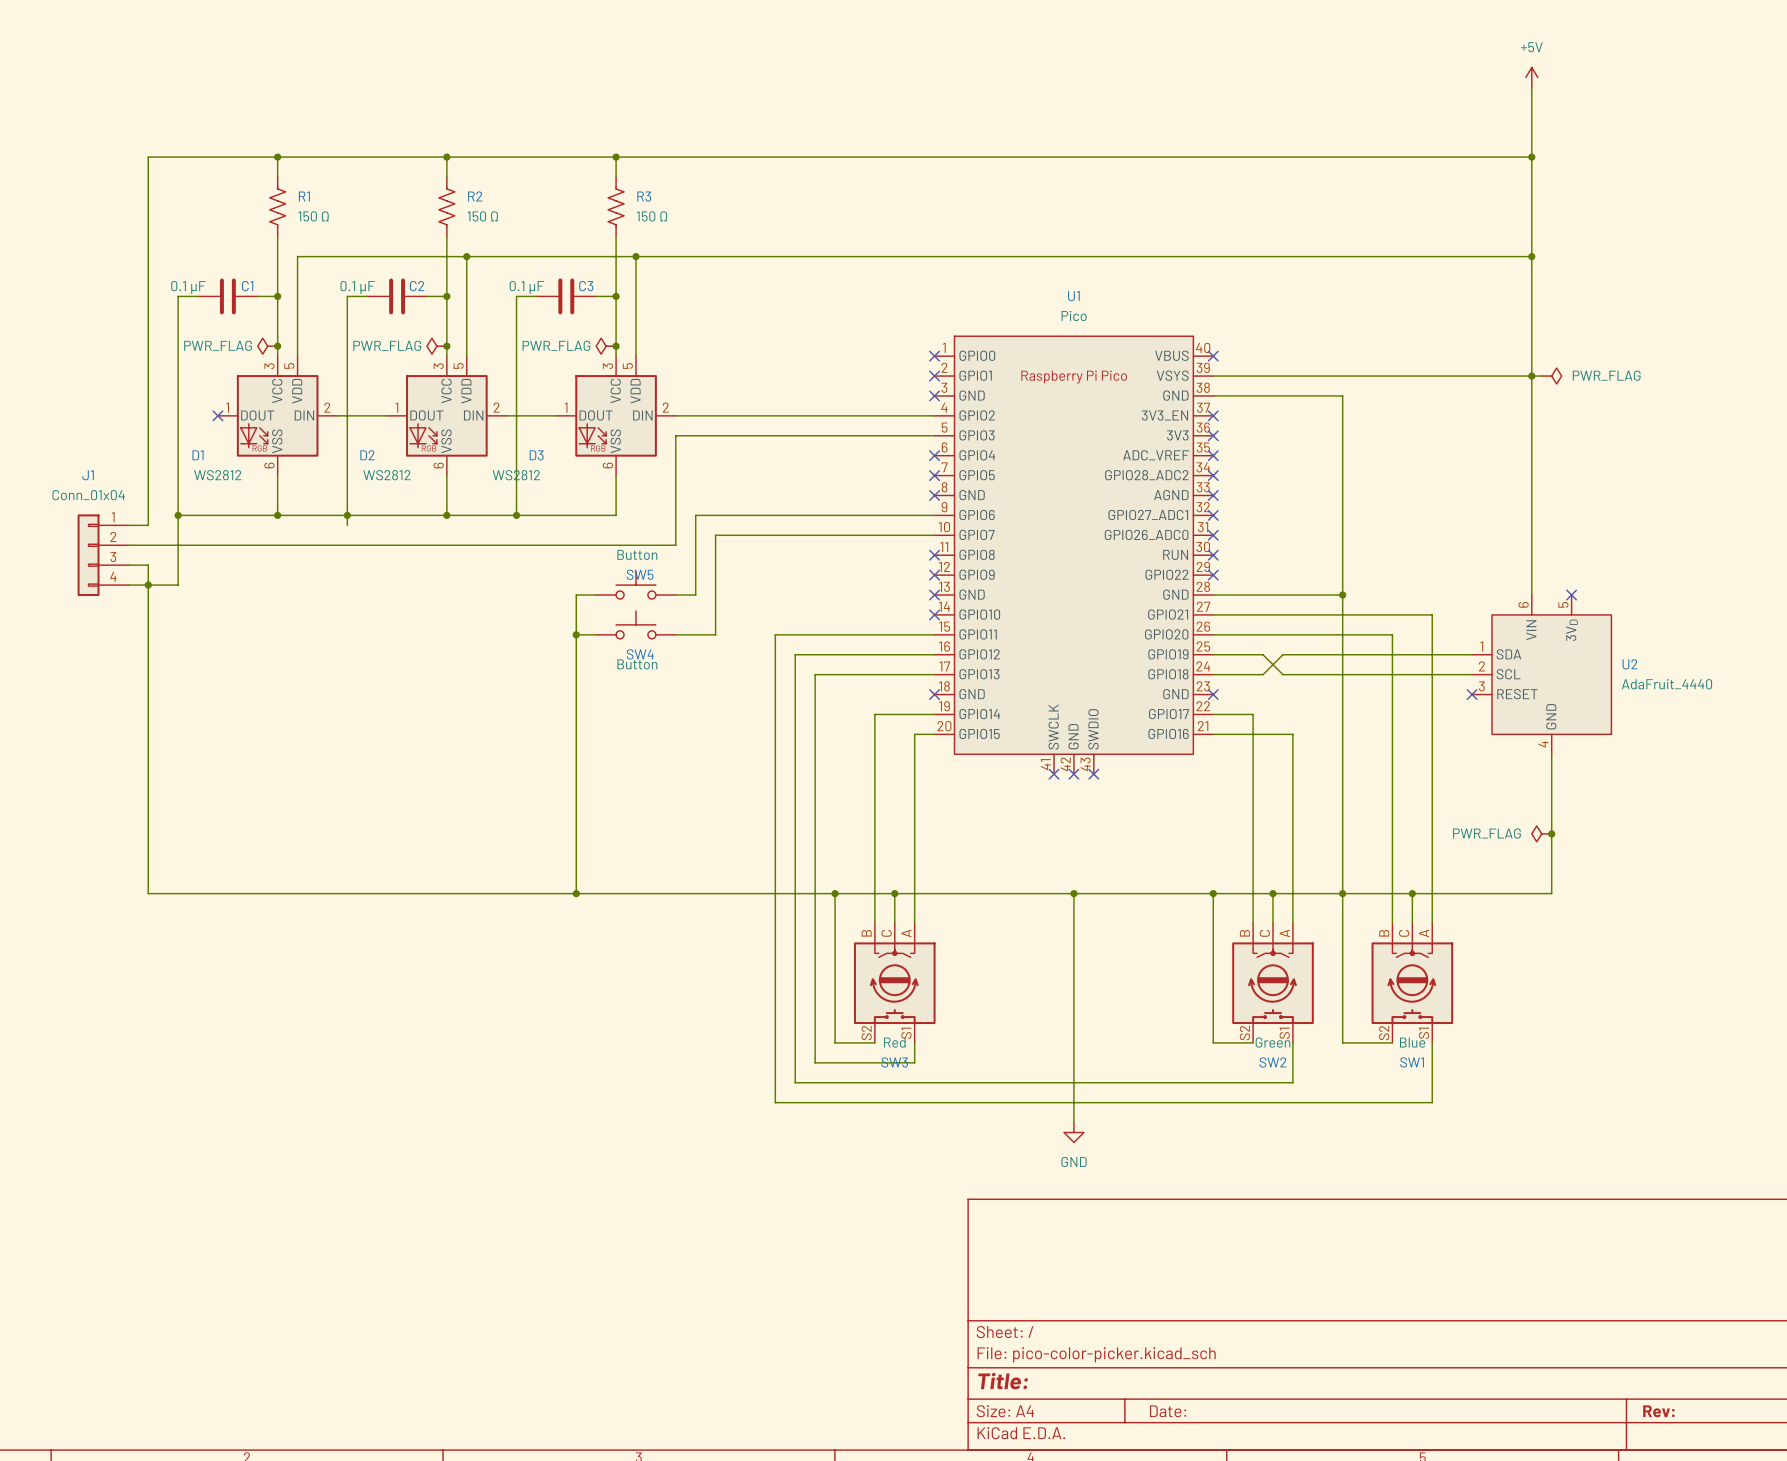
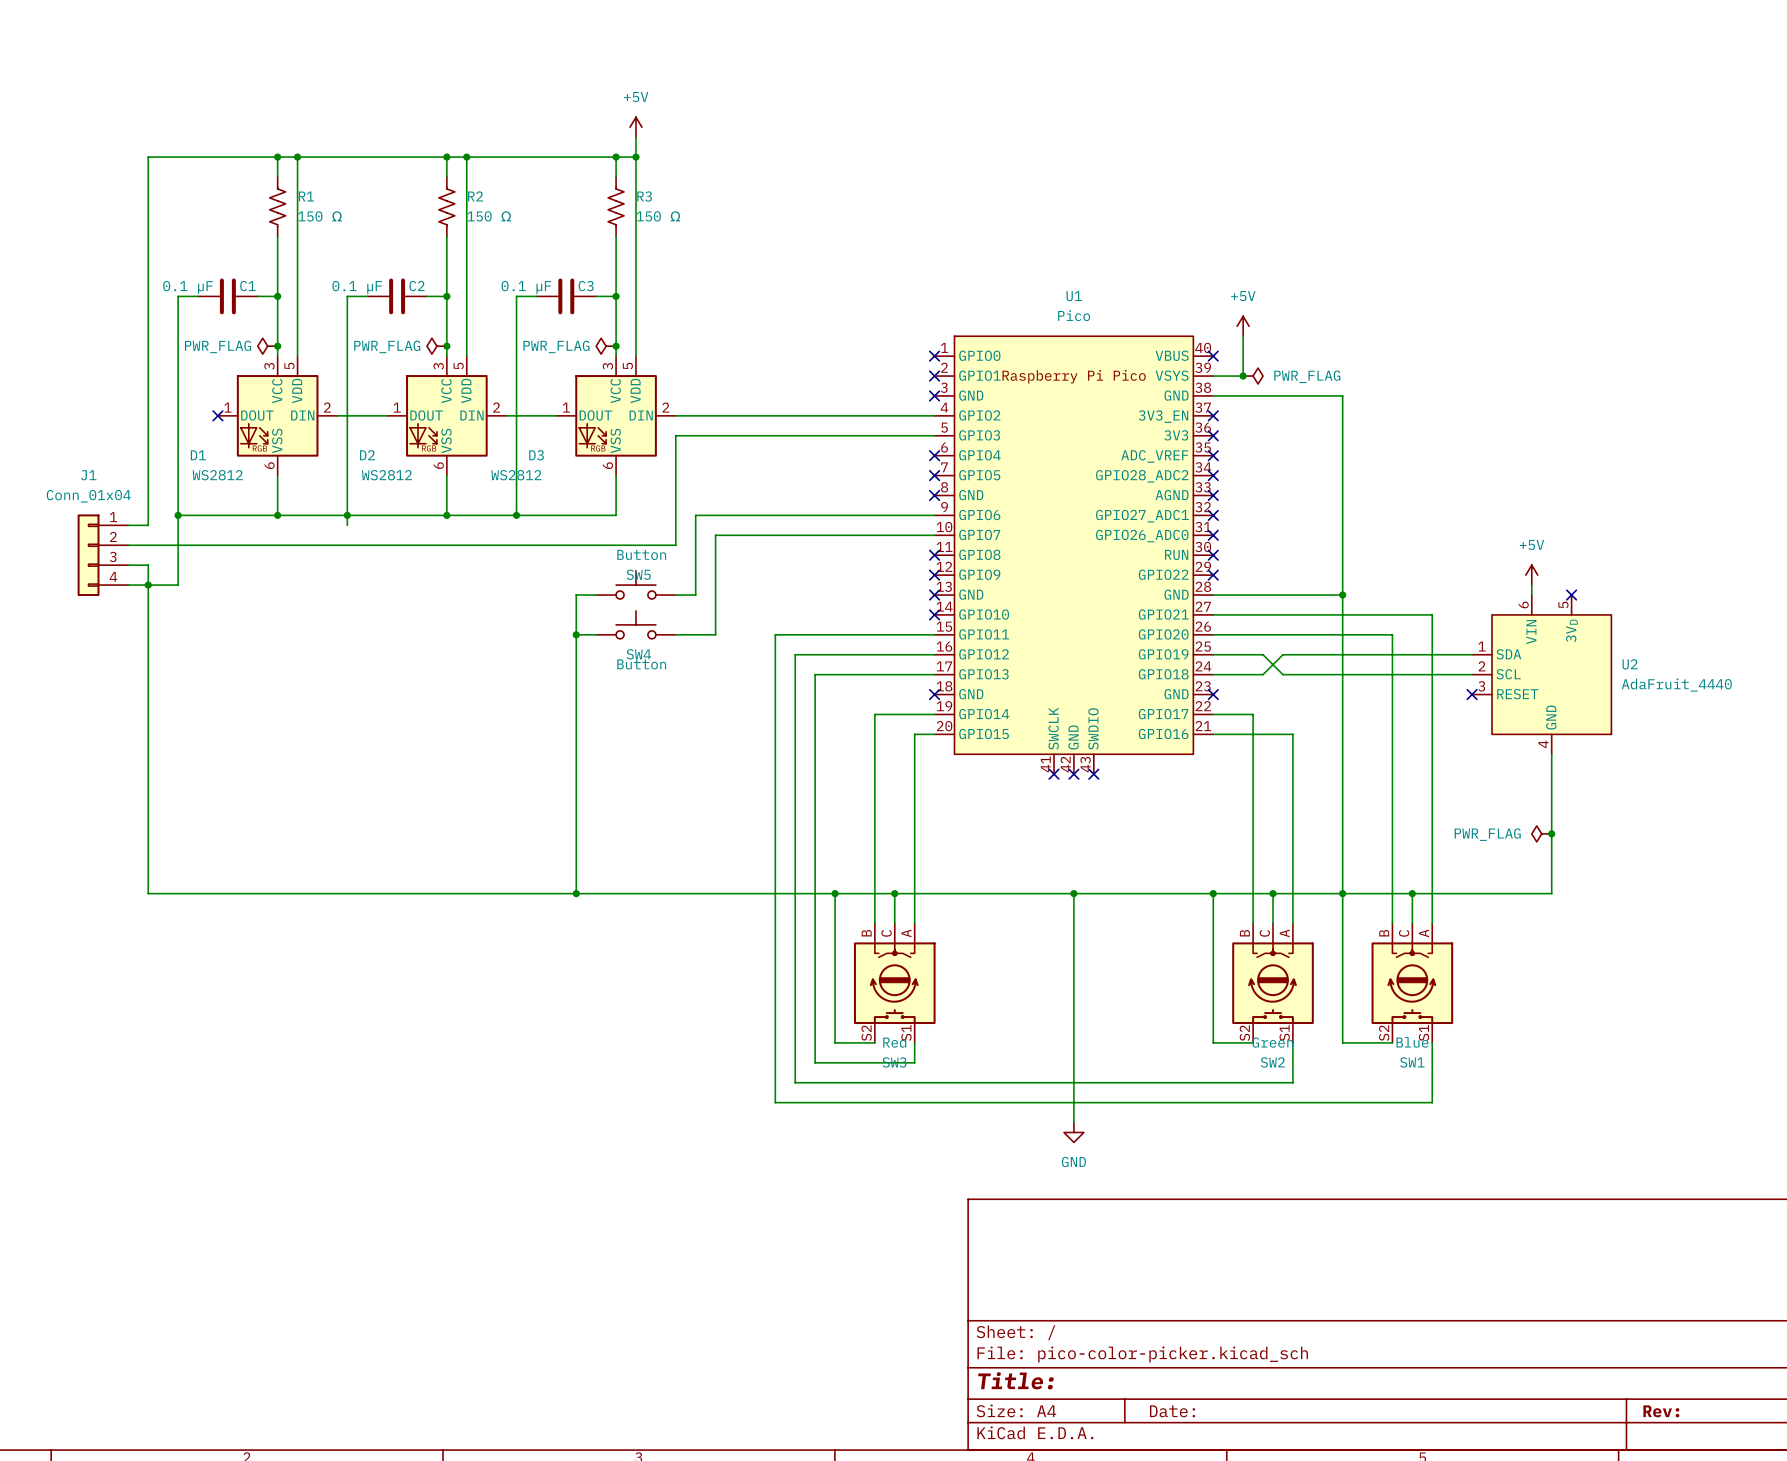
power symbol: +5V (1531, 77) -> none
wire: (1531, 87) (1531, 585) -> none
power symbol: none -> +5V (635, 127)
wire: none -> (635, 137) (635, 256)
junction: none -> (297, 157)
wire: none -> (466, 157) (466, 256)
junction: none -> (466, 157)
wire: (635, 157) (1531, 157) -> none
junction: none -> (635, 157)
junction: (1531, 157) -> none
wire: (297, 256) (1531, 256) -> (297, 256) (297, 157)
junction: (466, 256) -> none
junction: (635, 256) -> none
junction: (1531, 256) -> none
power symbol: none -> +5V (1243, 326)
wire: (1243, 376) (1541, 376) -> (1243, 376) (1243, 336)
junction: none -> (1243, 376)
power symbol: none -> PWR_FLAG (1253, 376)
junction: (1531, 376) -> none
power symbol: PWR_FLAG (1551, 376) -> none
power symbol: none -> +5V (1531, 575)

